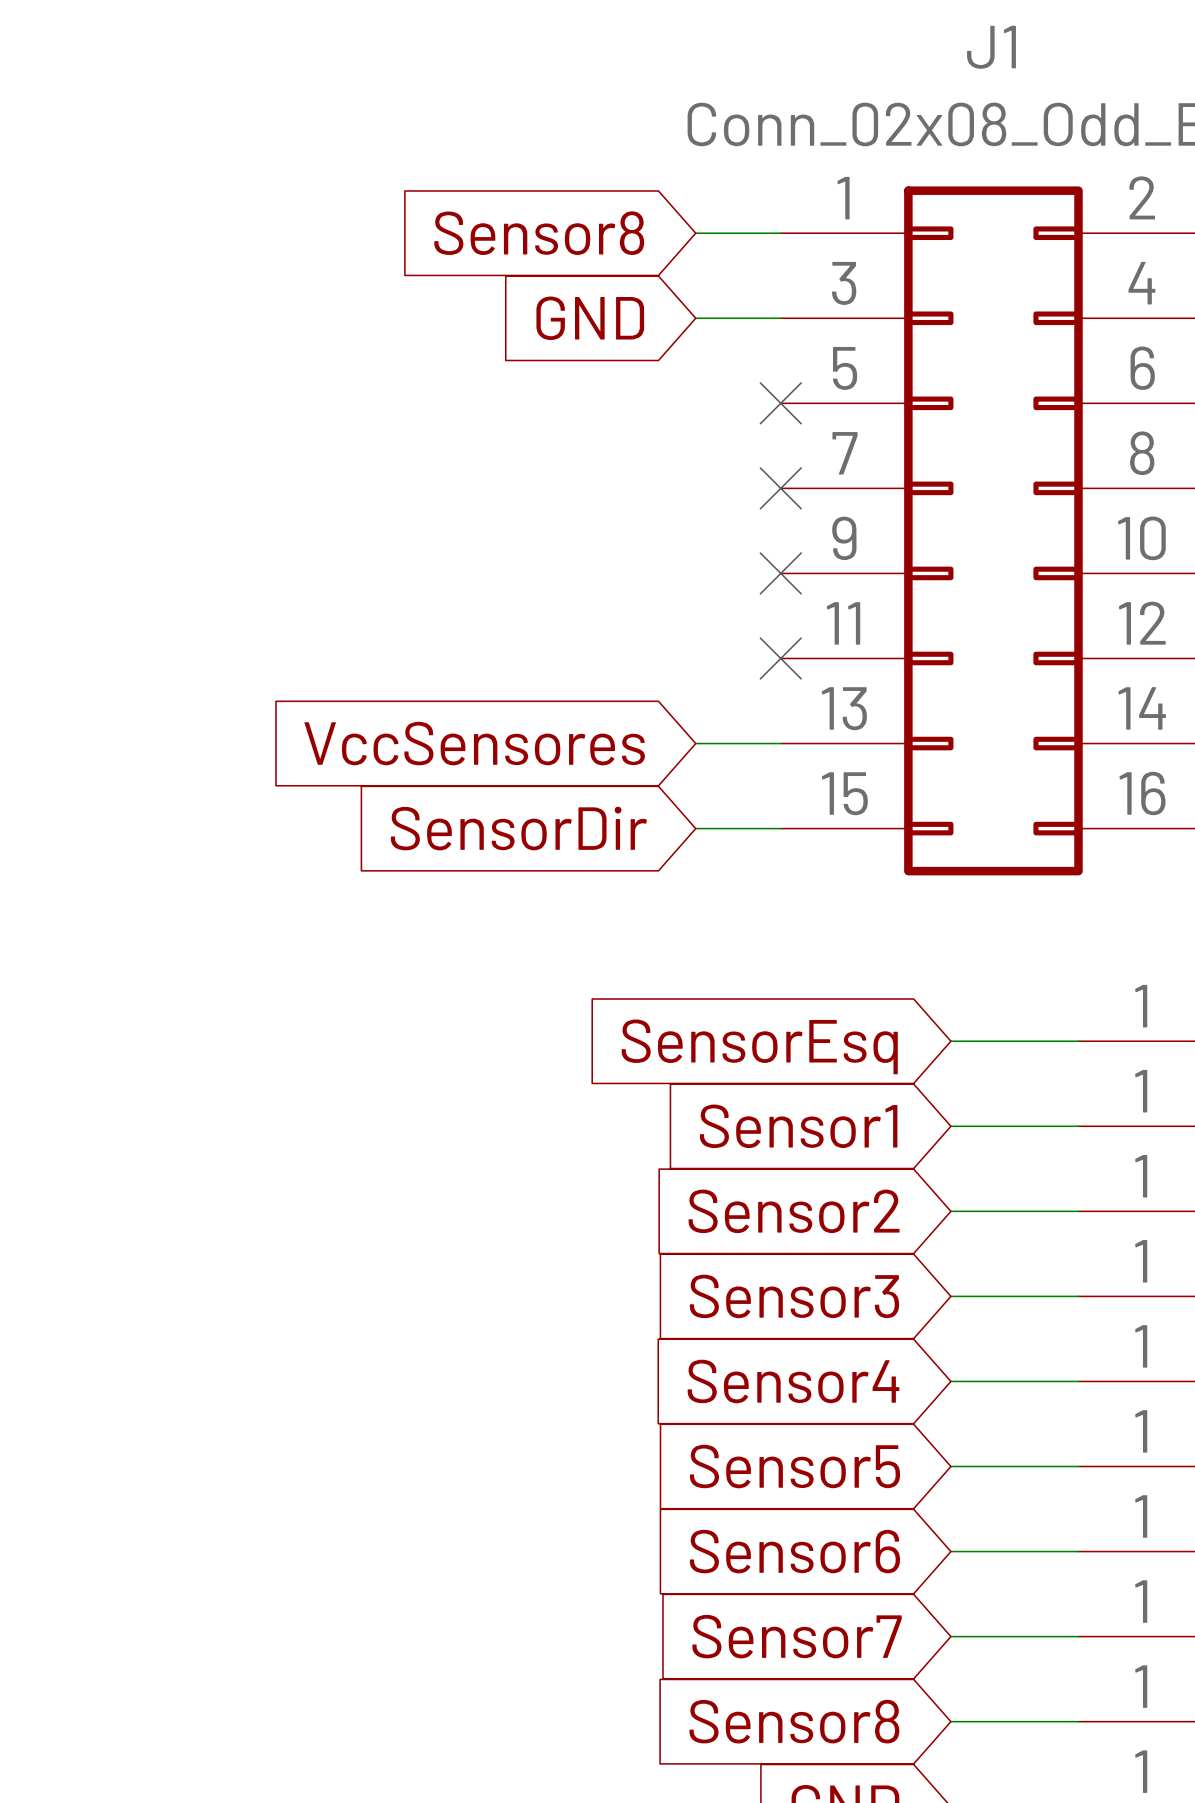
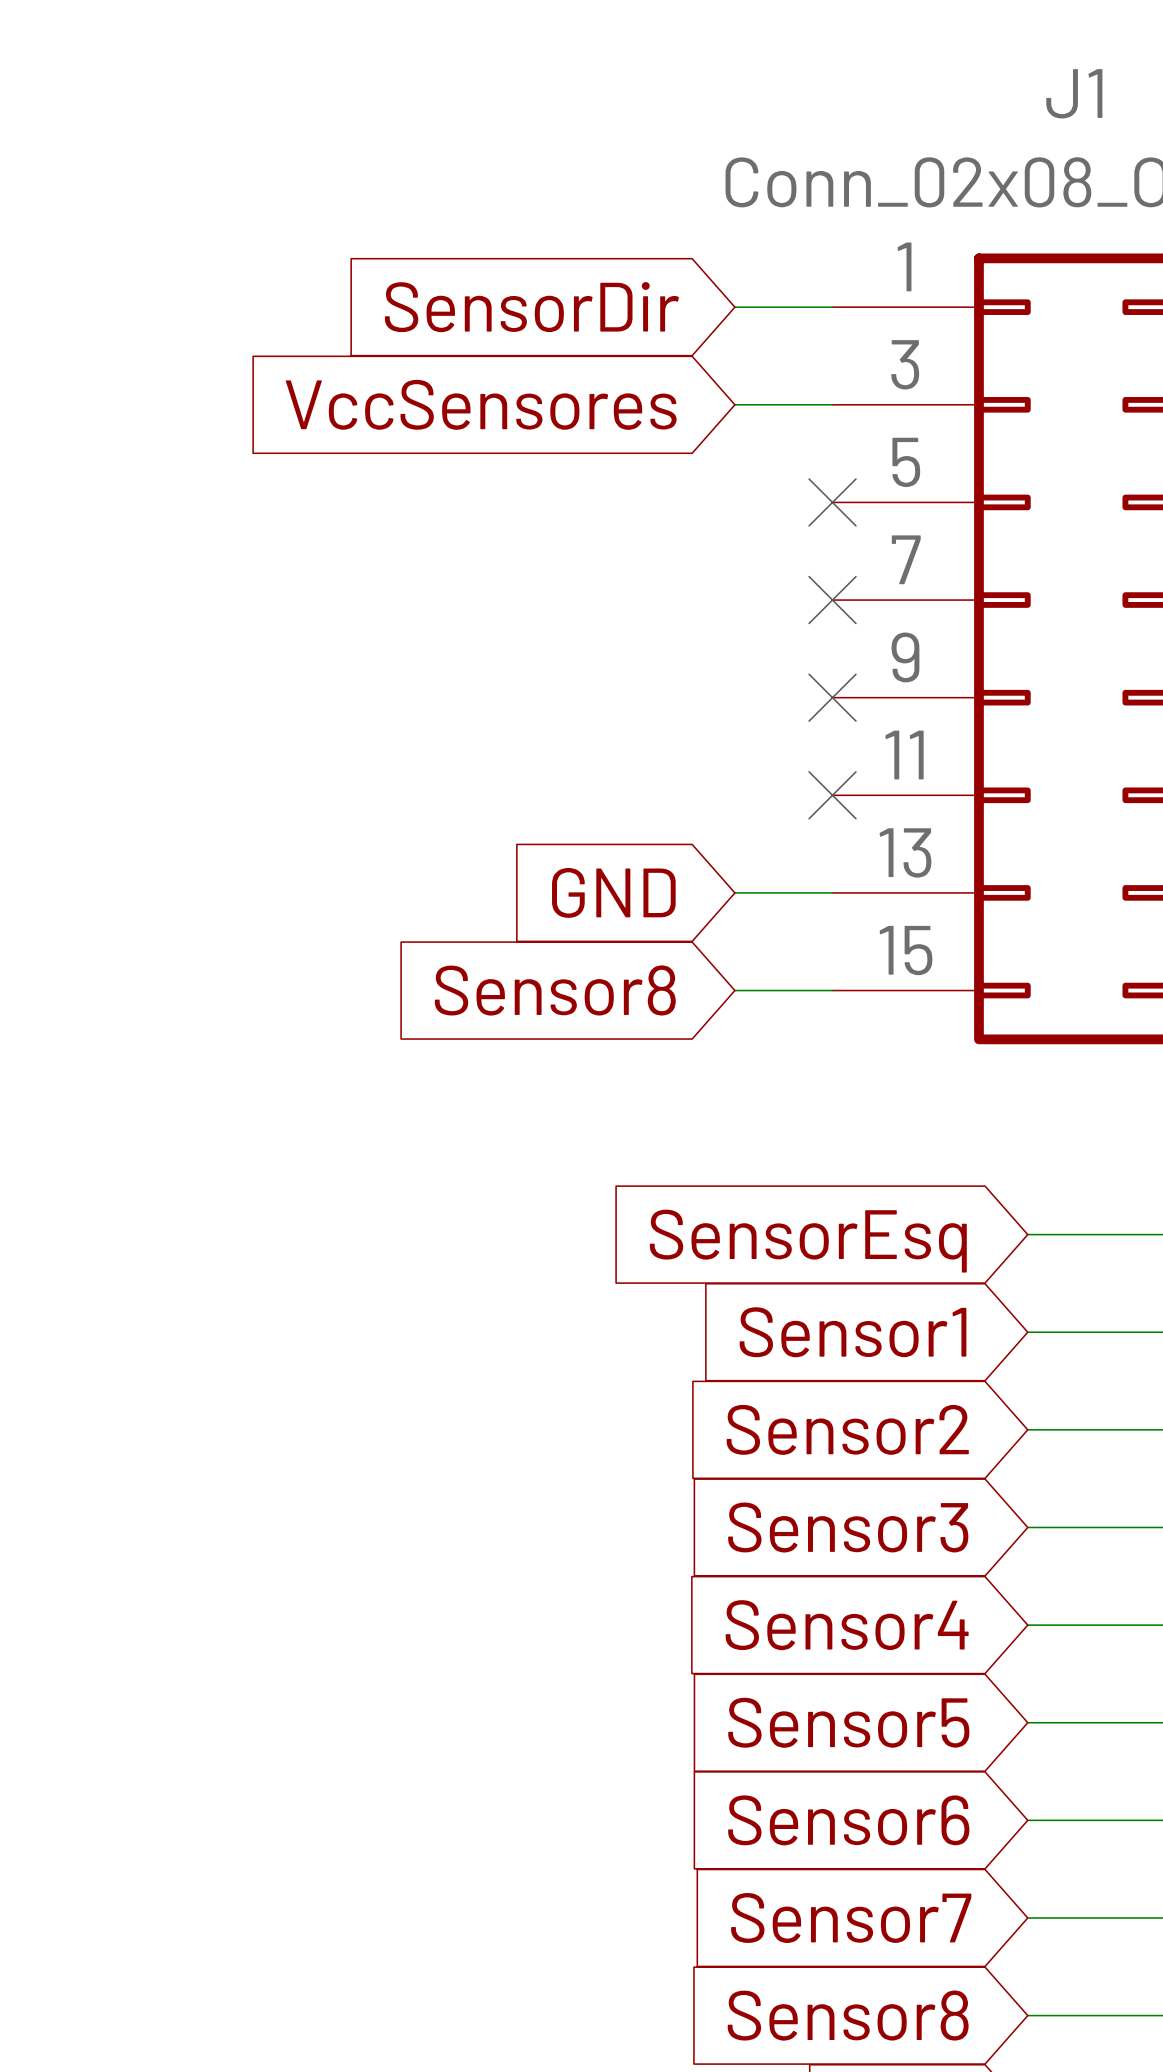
global label: Sensor8 (539, 233) -> SensorDir (531, 307)
global label: GND (590, 318) -> VccSensores (481, 404)
global label: VccSensores (474, 743) -> GND (613, 892)
global label: SensorDir (518, 828) -> Sensor8 (555, 990)

